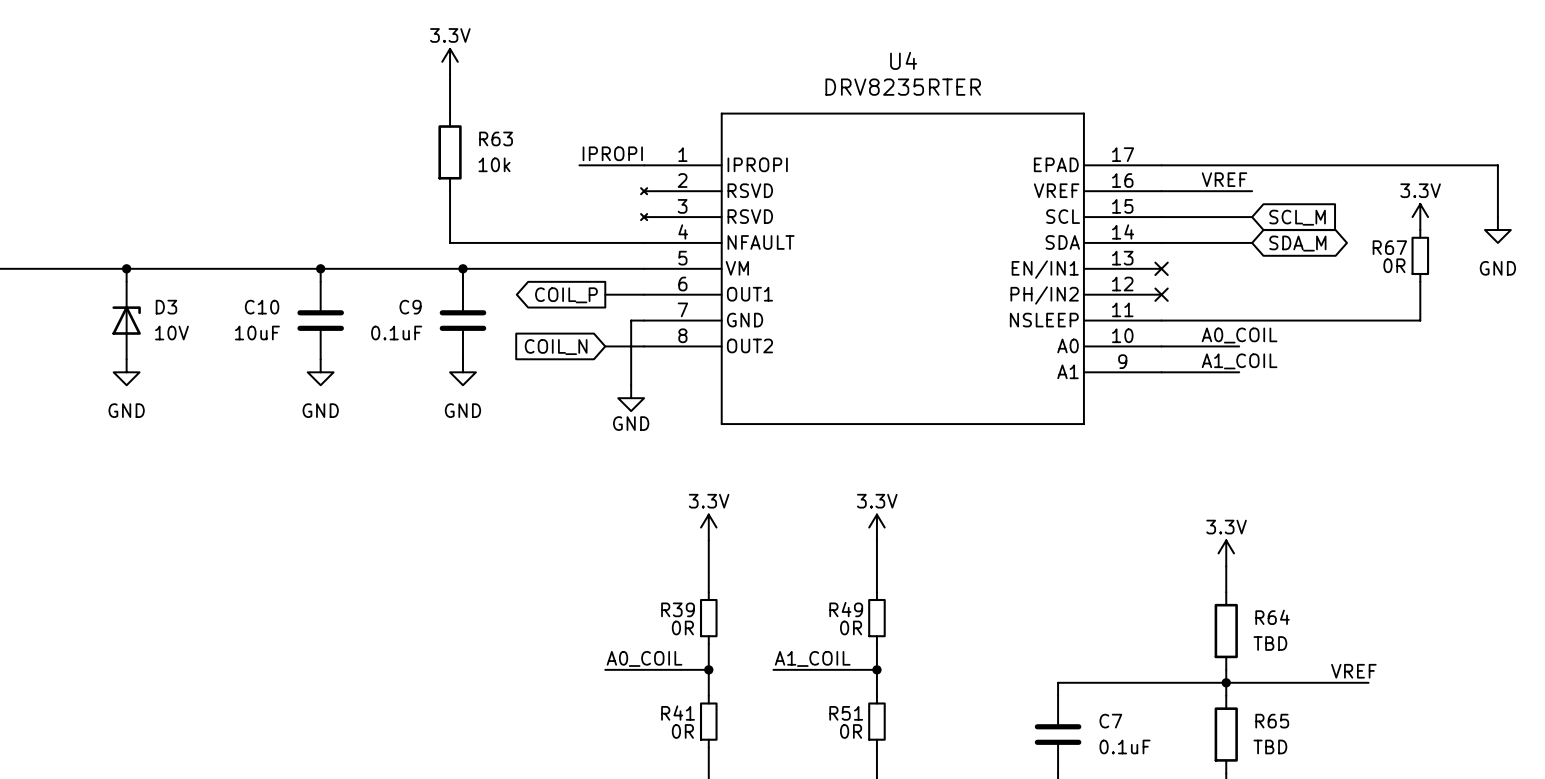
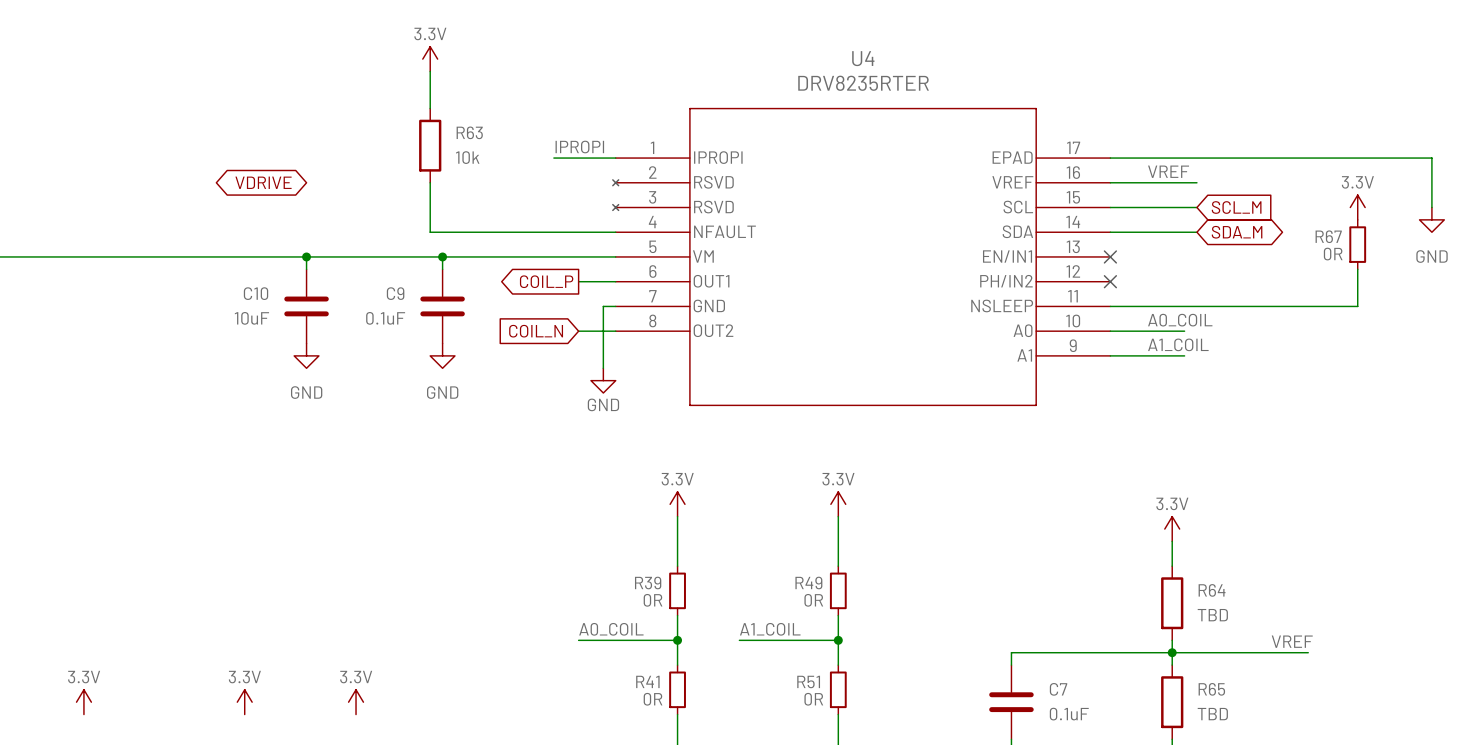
global label: none -> VDRIVE (263, 182)
wire: (126, 268) (126, 281) -> none
junction: (126, 268) -> none
D3: 10V (126, 320) -> none
power symbol: GND (126, 372) -> none
power symbol: none -> 3.3V (83, 702)
power symbol: none -> 3.3V (244, 702)
power symbol: none -> 3.3V (356, 702)

